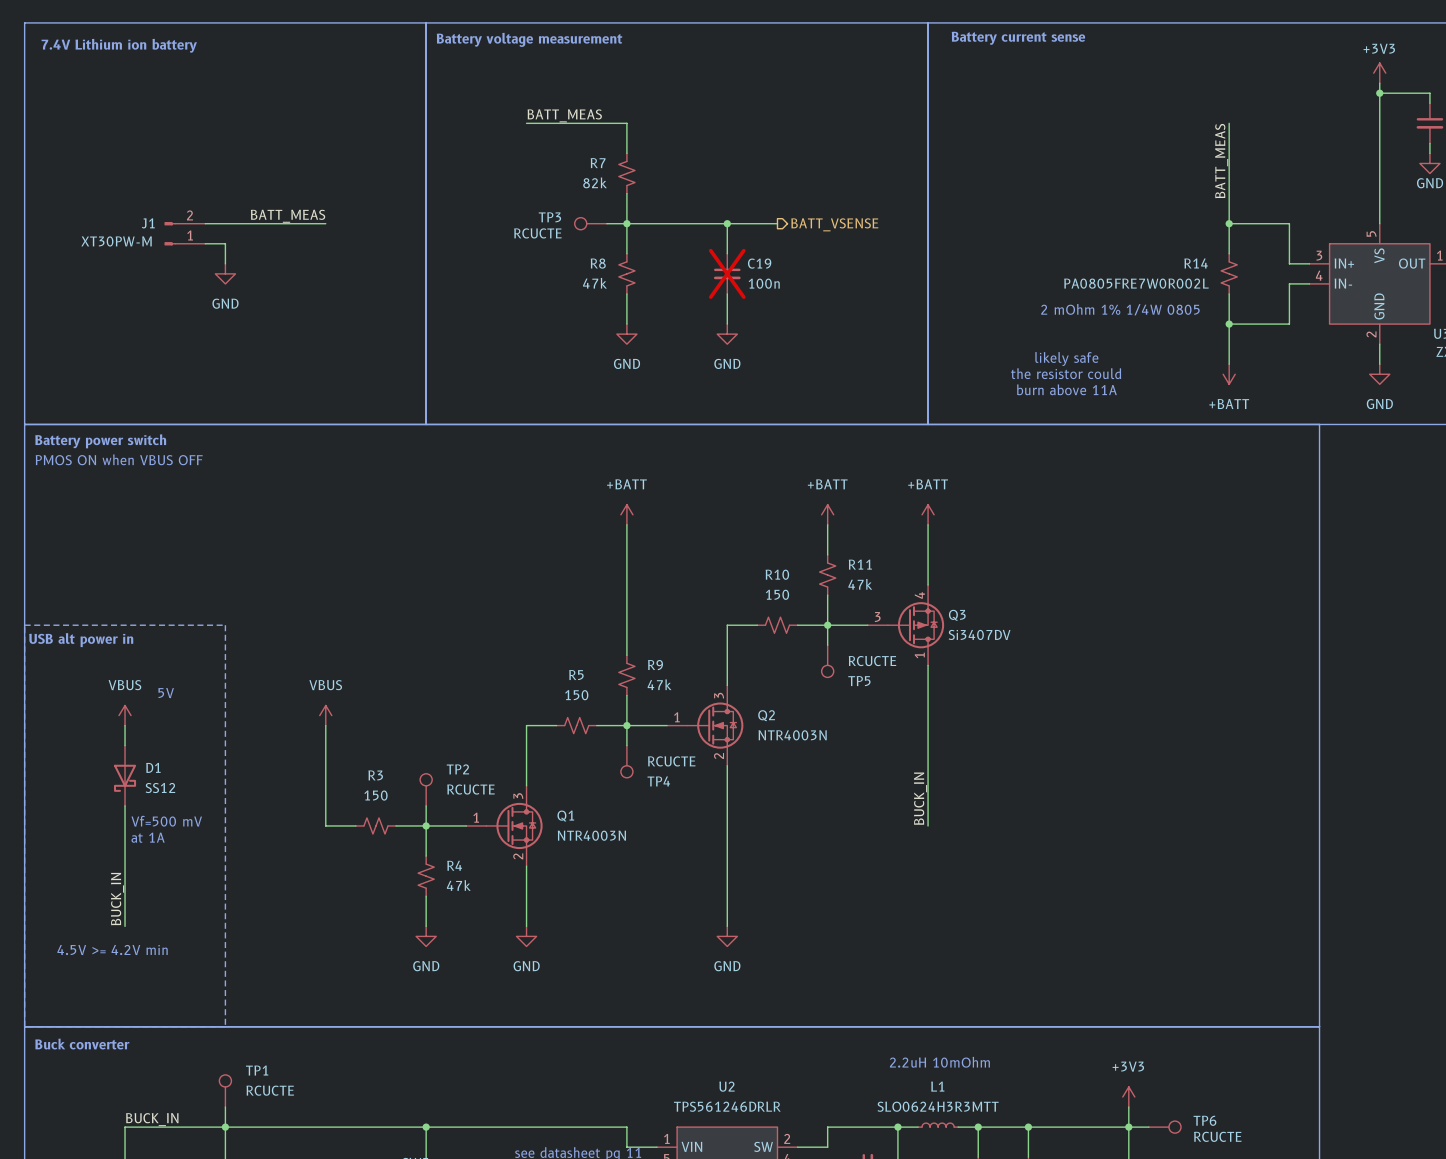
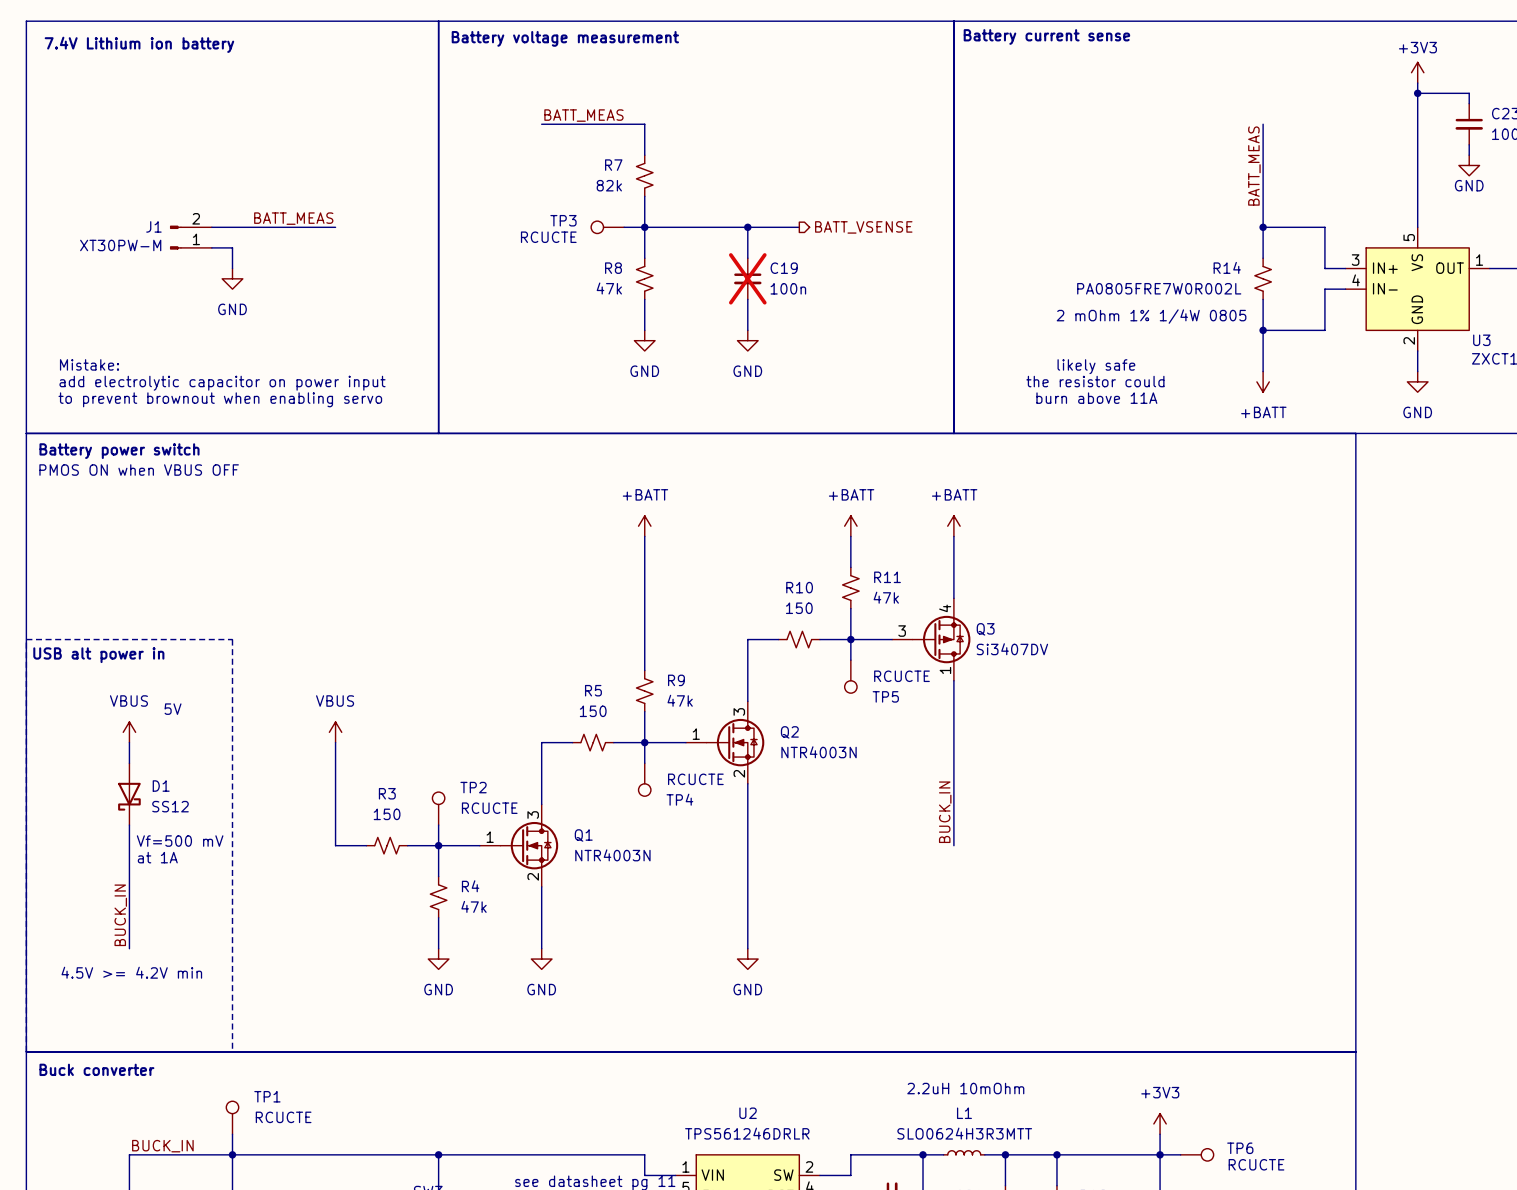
text: none -> Mistake: (89, 364)
text: none -> add electrolytic capacitor on power input (222, 383)
text: none -> to prevent brownout when enabling servo (220, 399)

